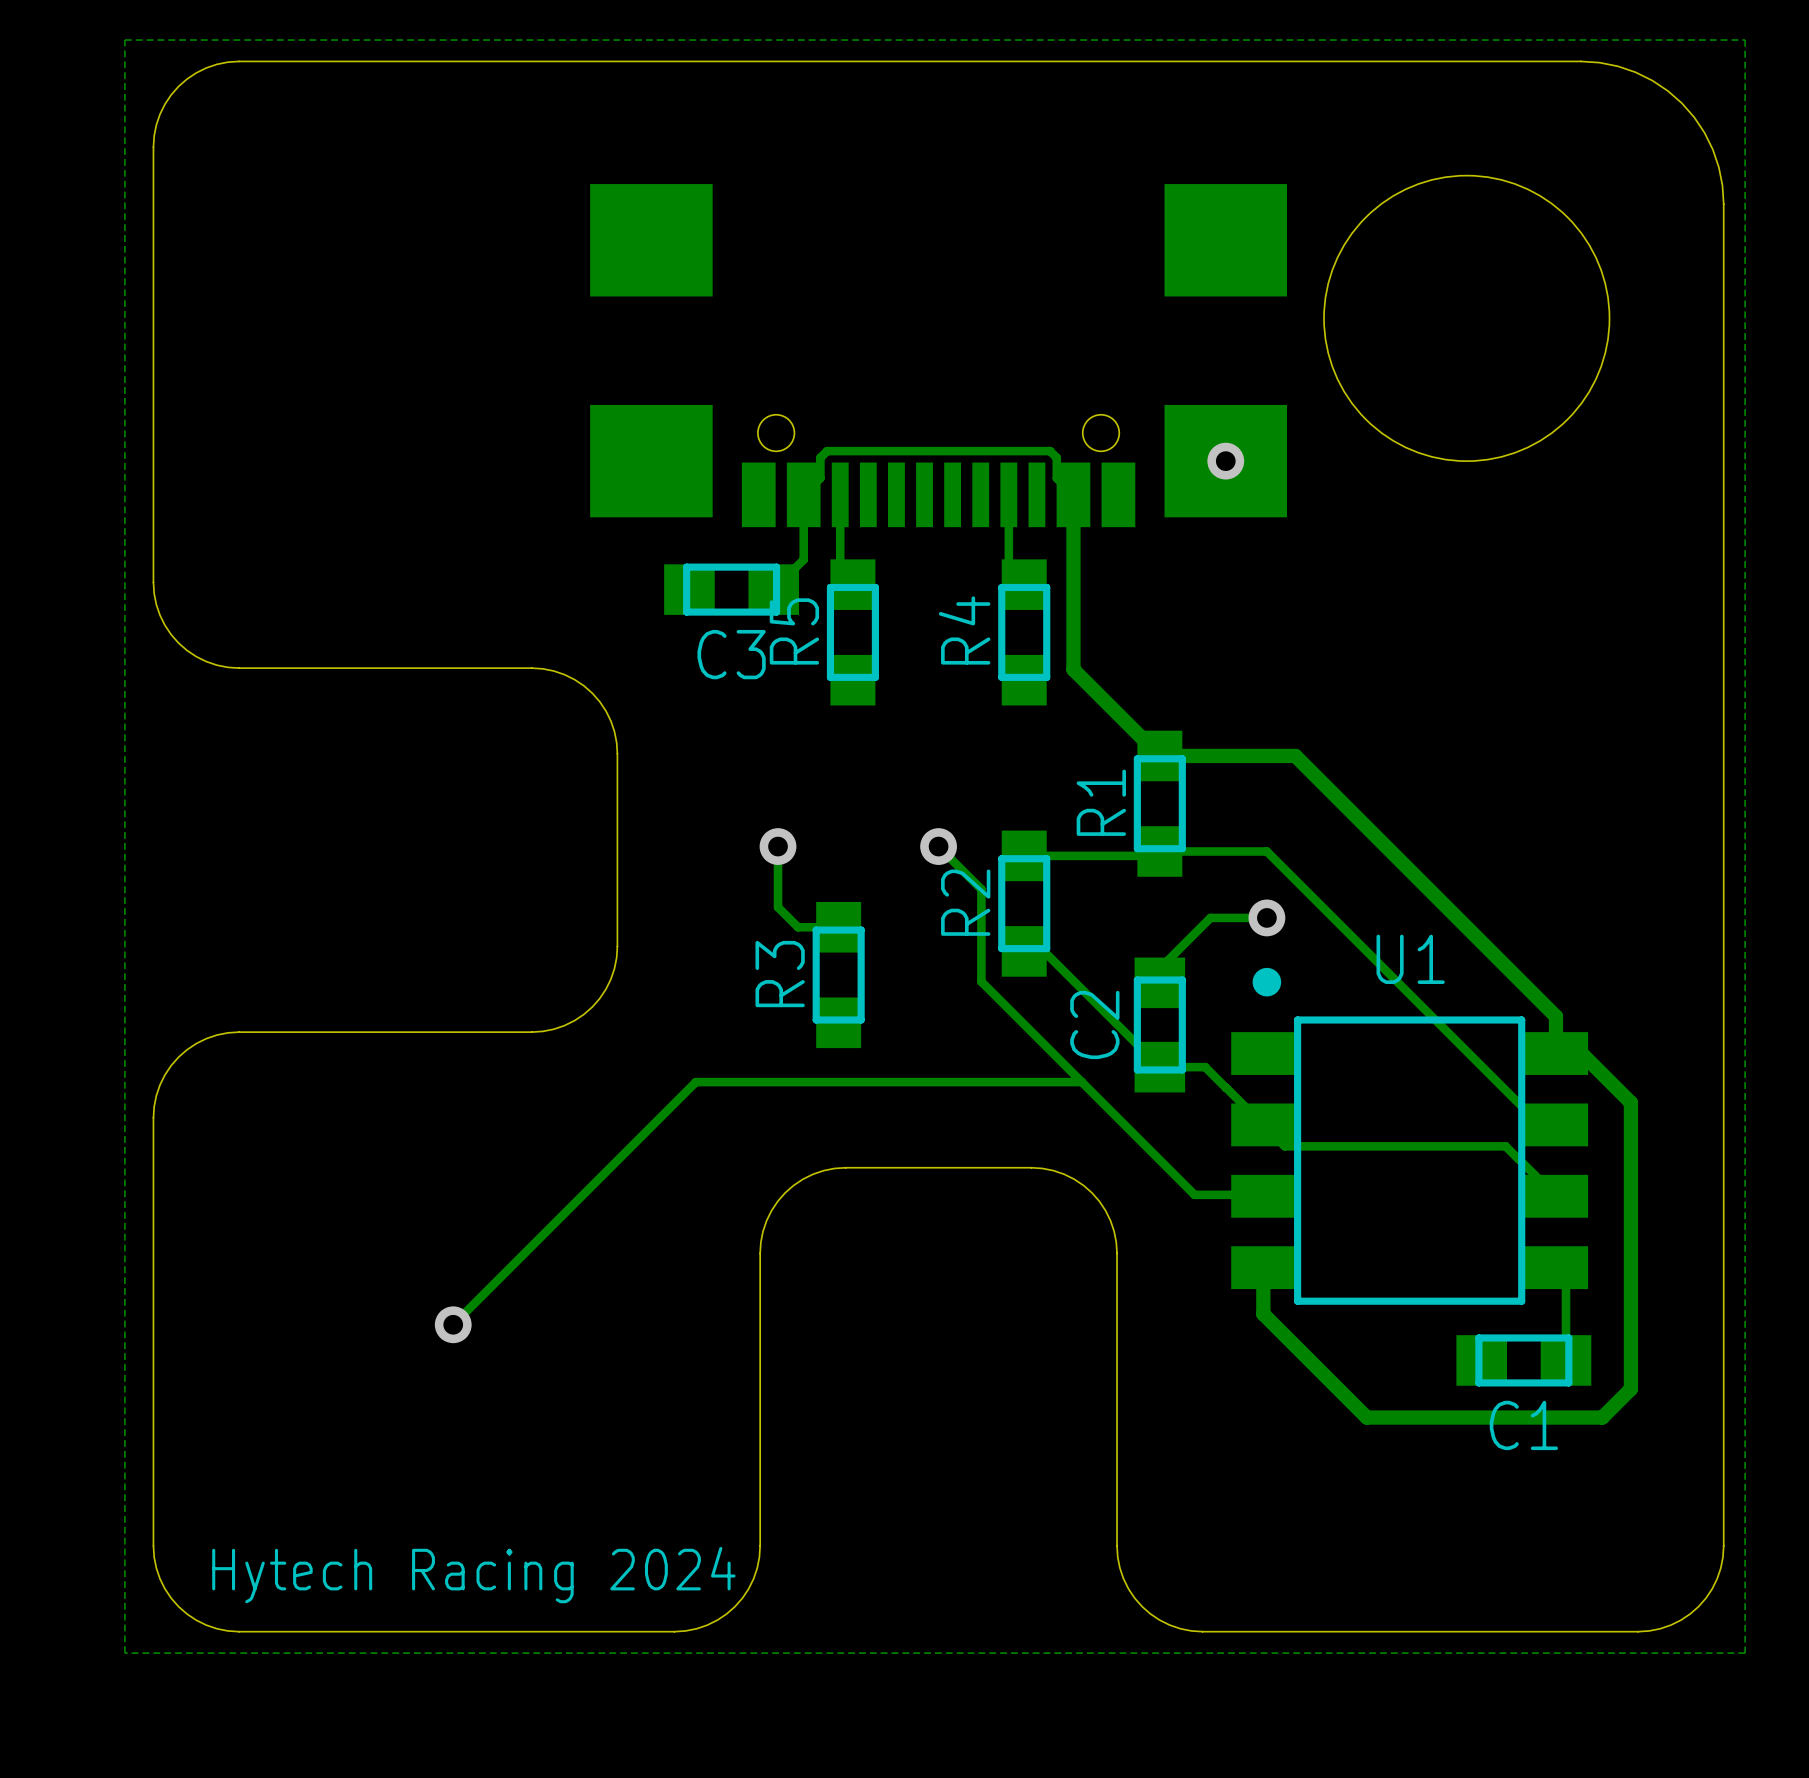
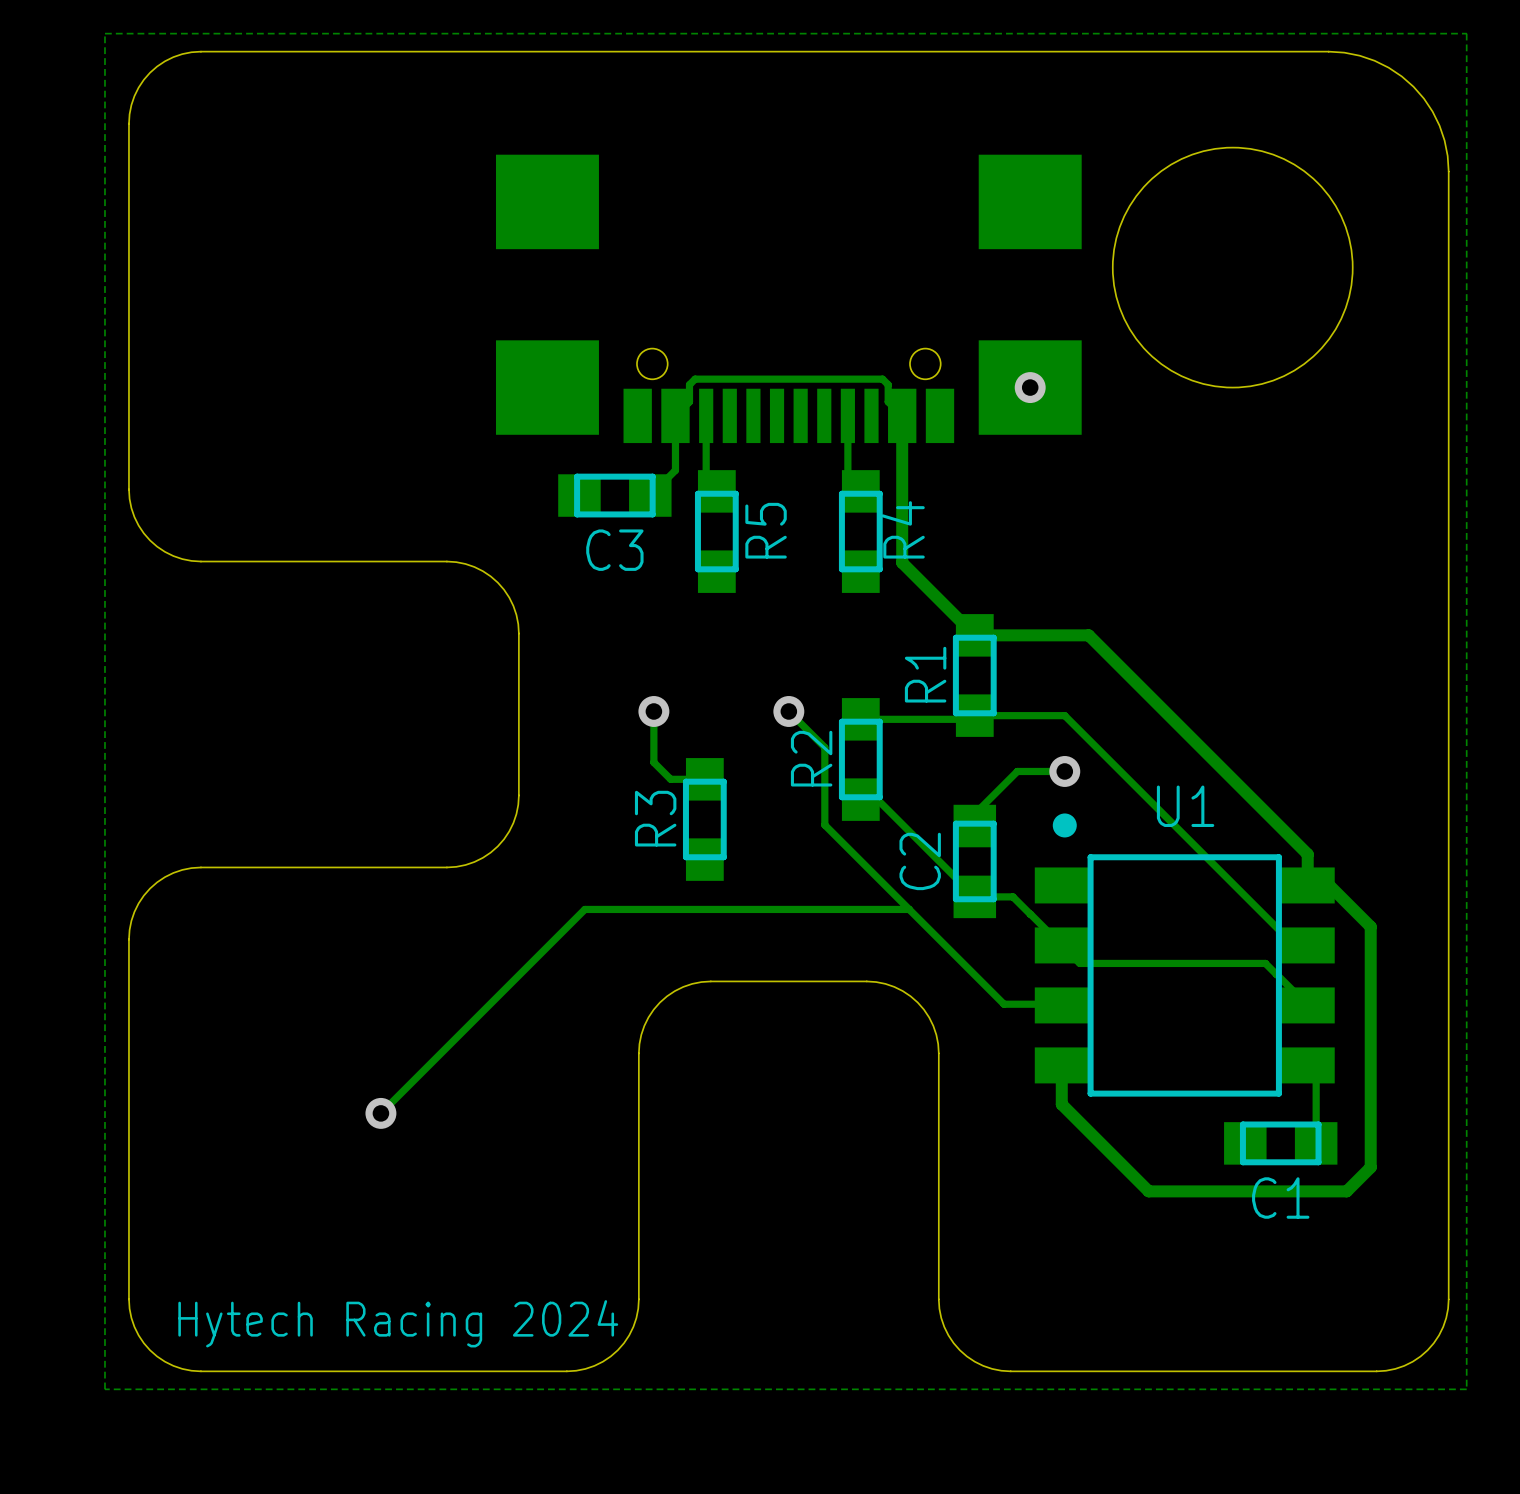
R4 name position: R4 (964, 630) -> R4 (903, 529)
R5 name position: R5 (794, 631) -> R5 (766, 530)

